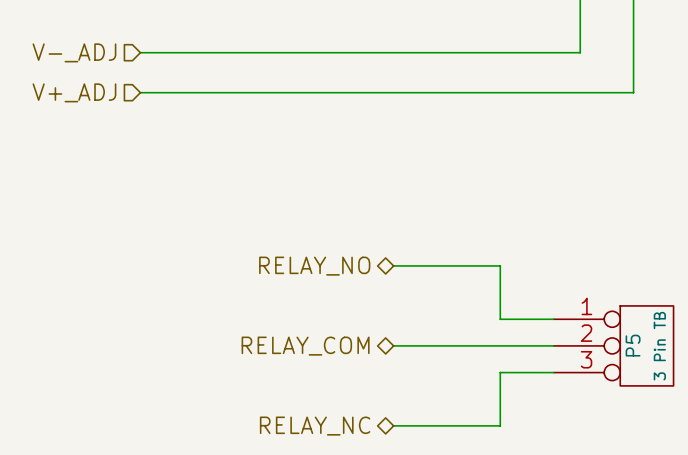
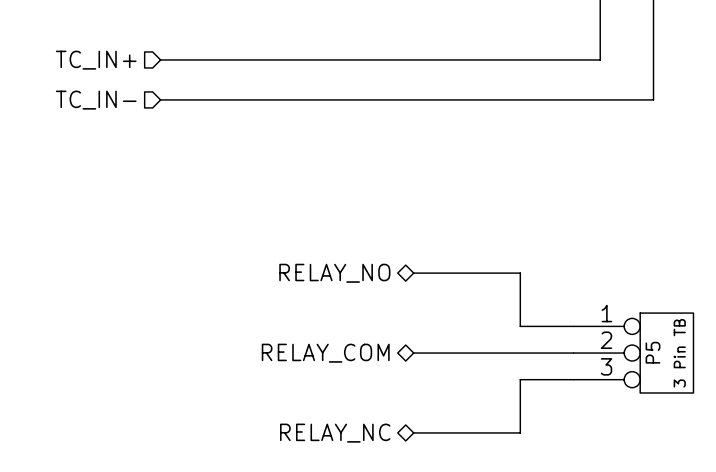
hierarchical label: V-_ADJ (74, 52) -> TC_IN+ (96, 60)
hierarchical label: V+_ADJ (74, 92) -> TC_IN- (96, 100)

